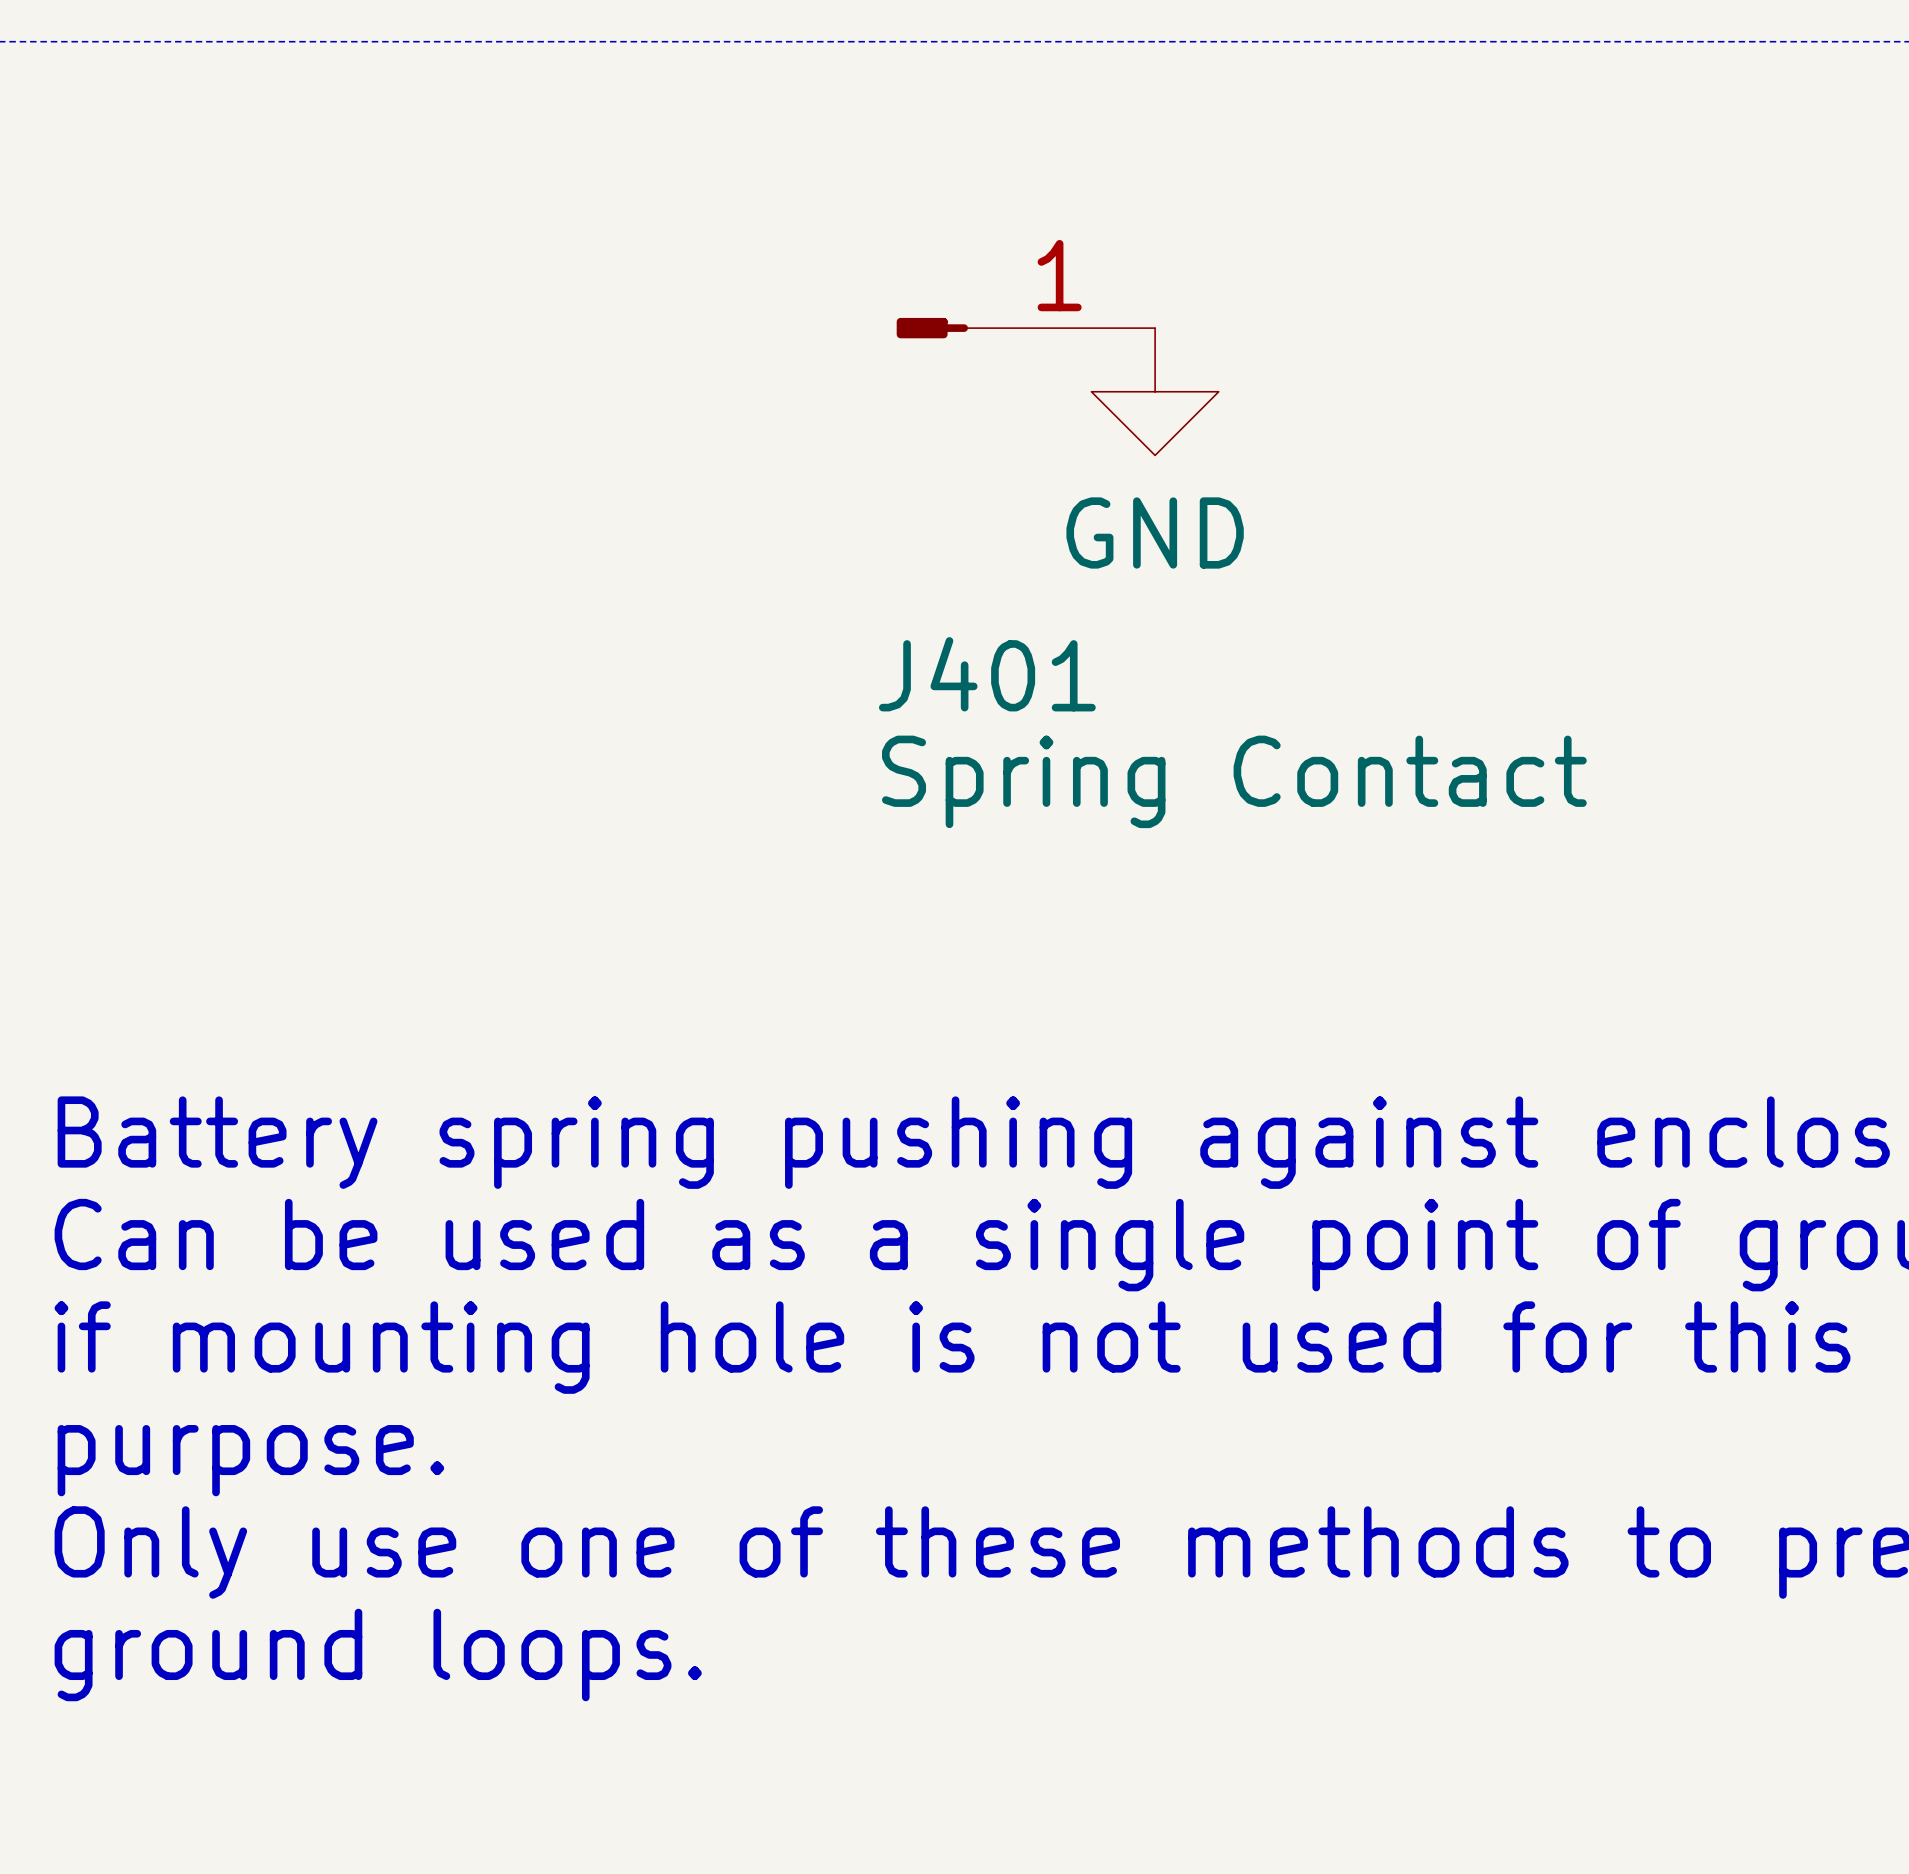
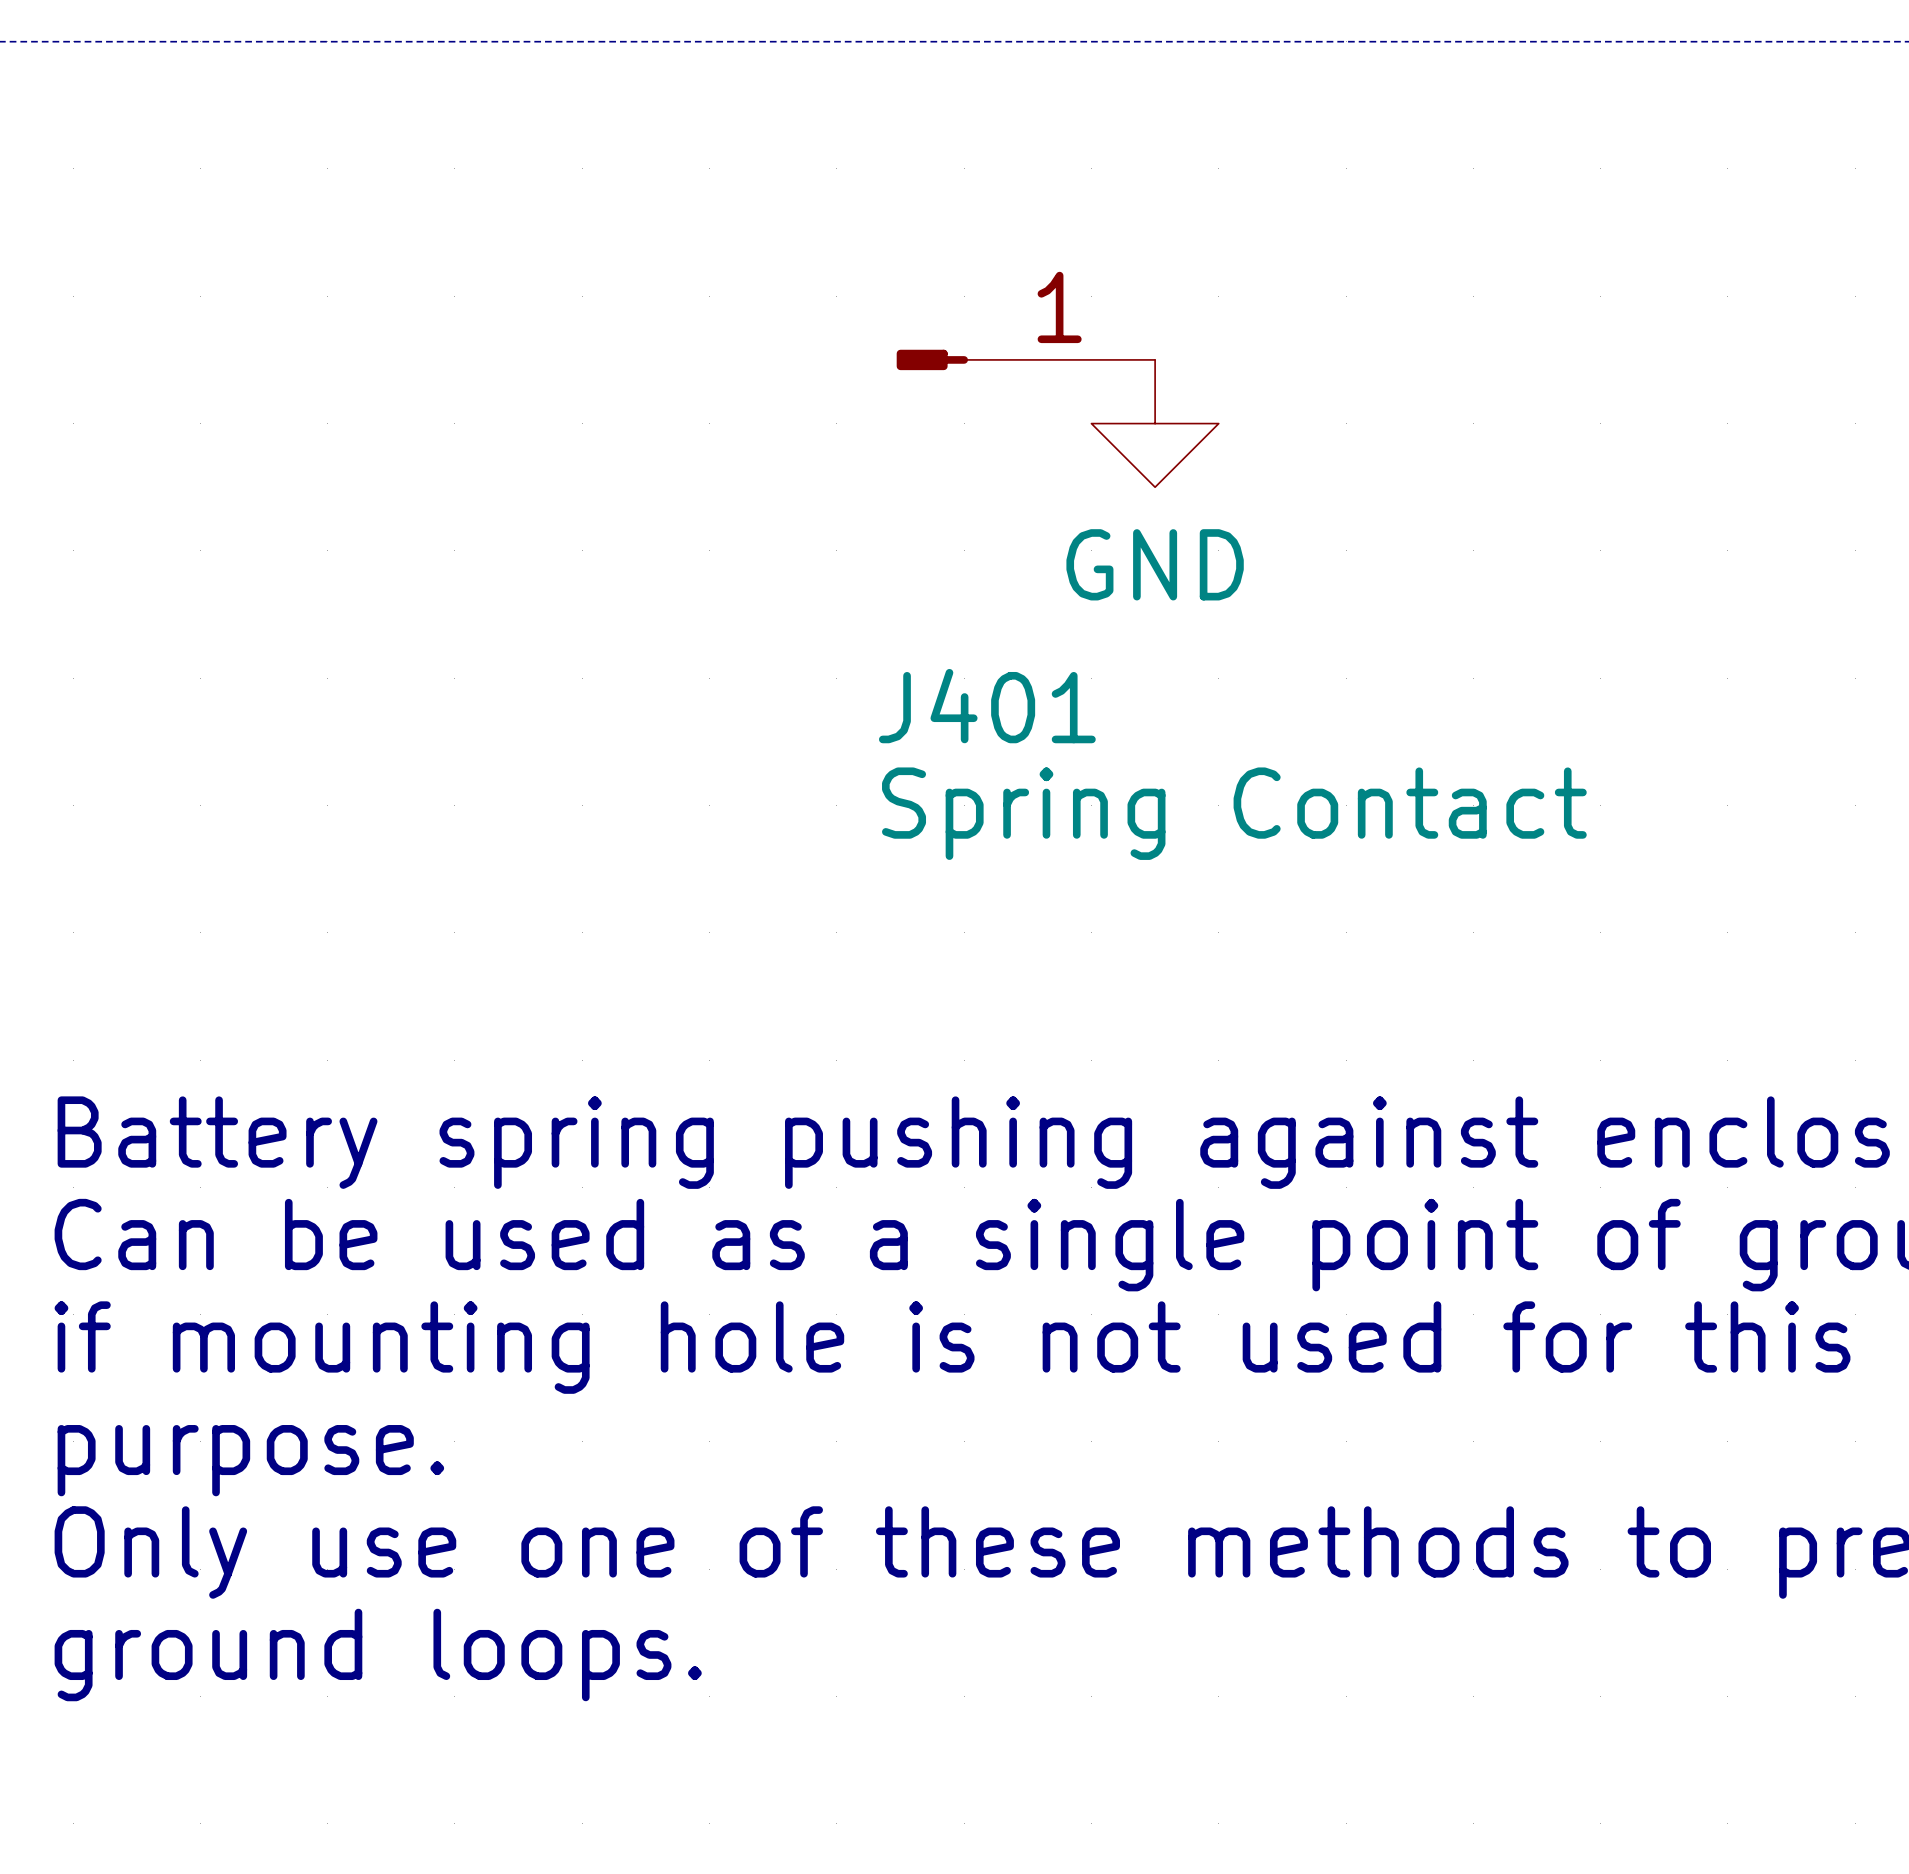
J401 position: (1025, 328) -> (1025, 359)
power symbol position: GND (1155, 391) -> GND (1155, 423)

